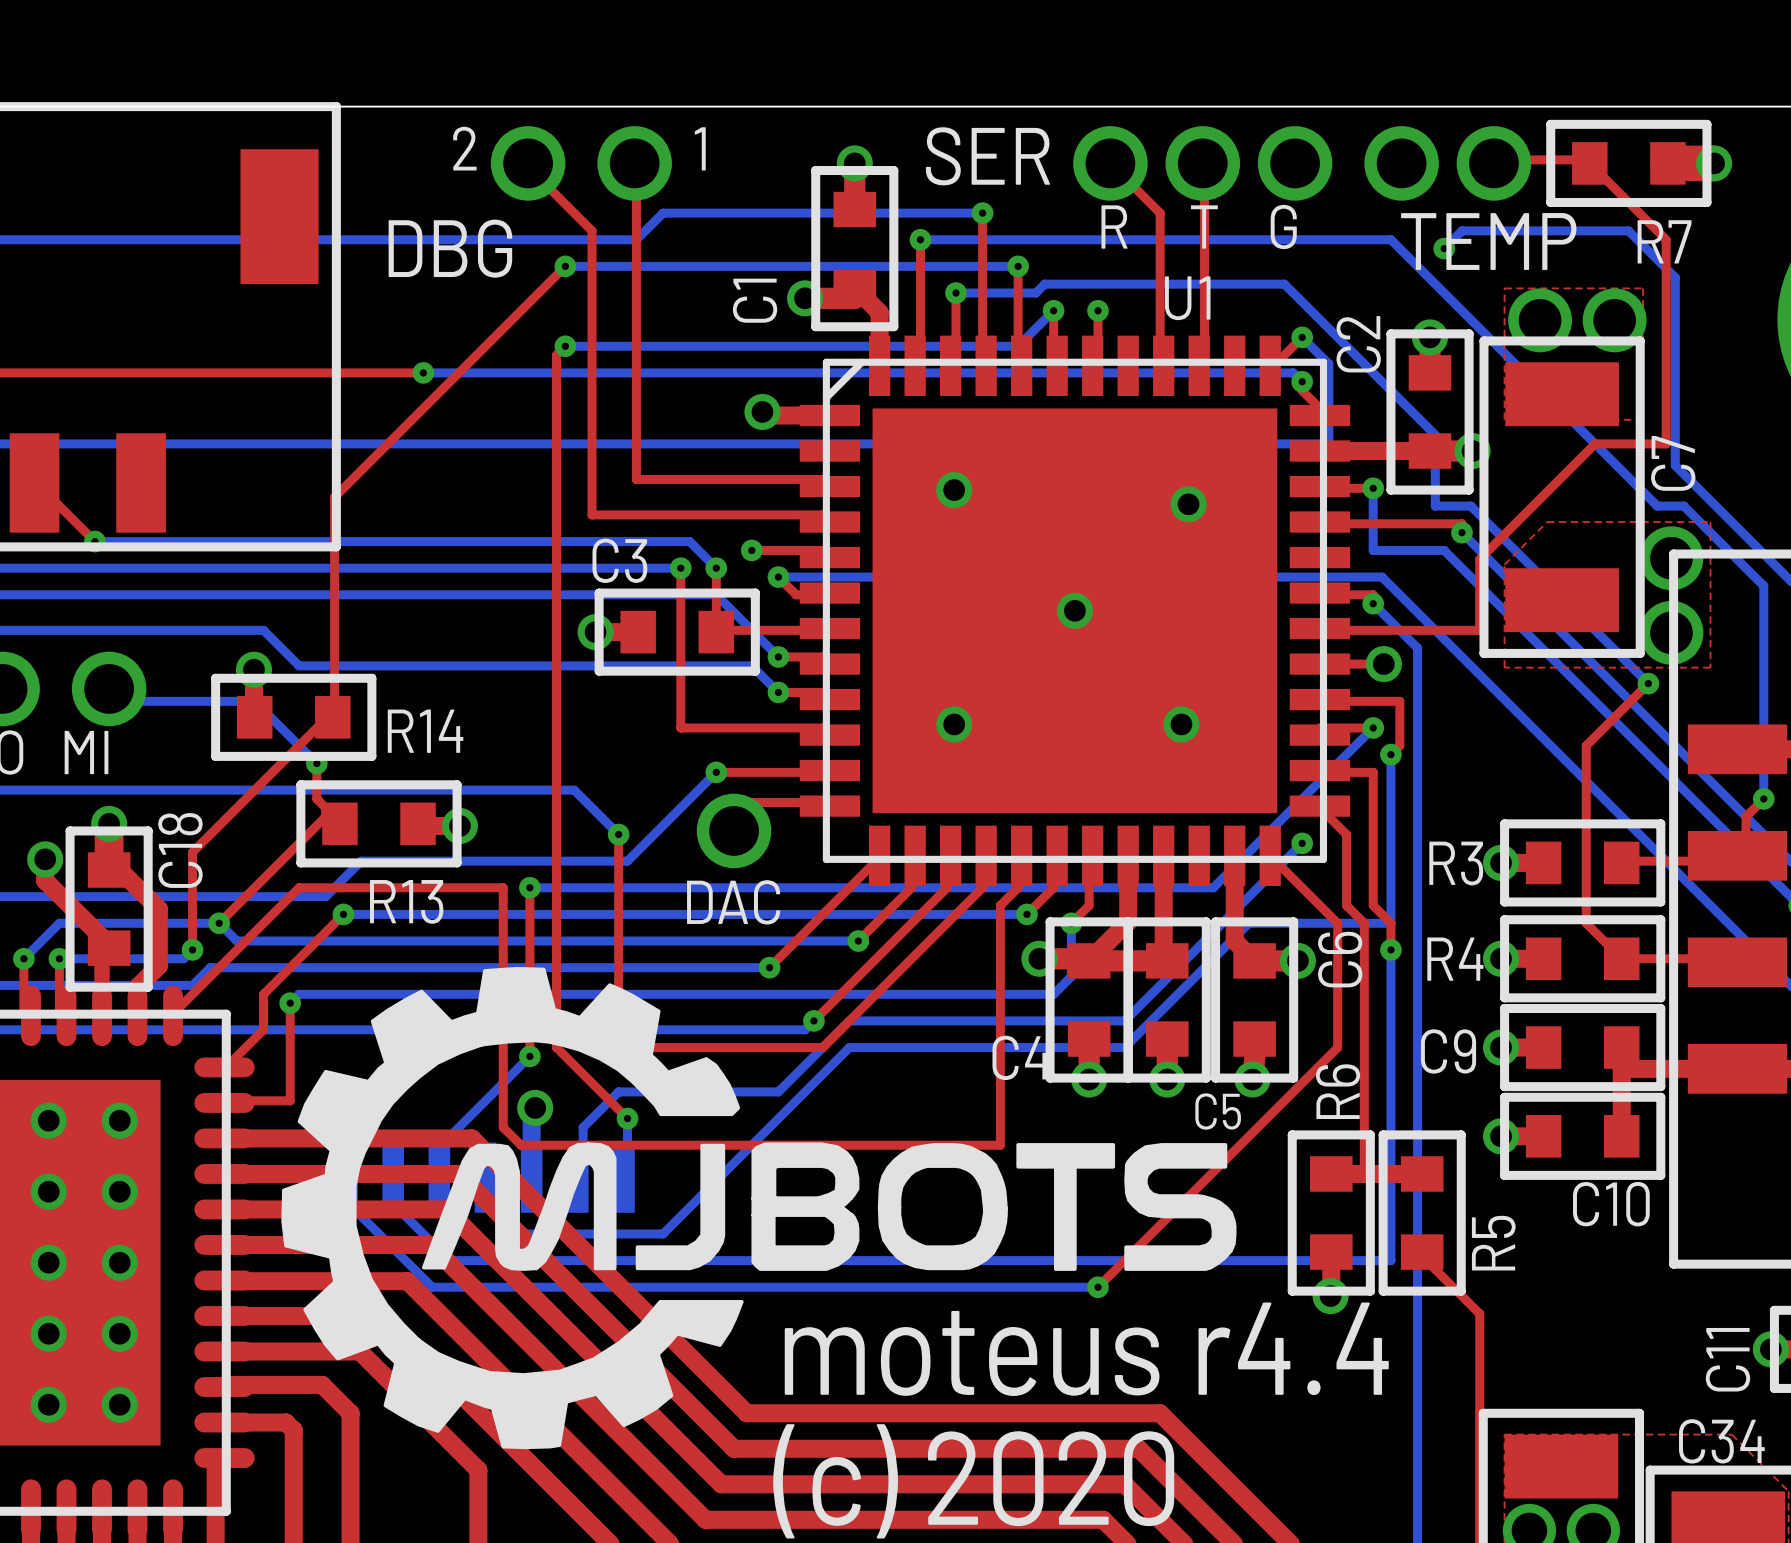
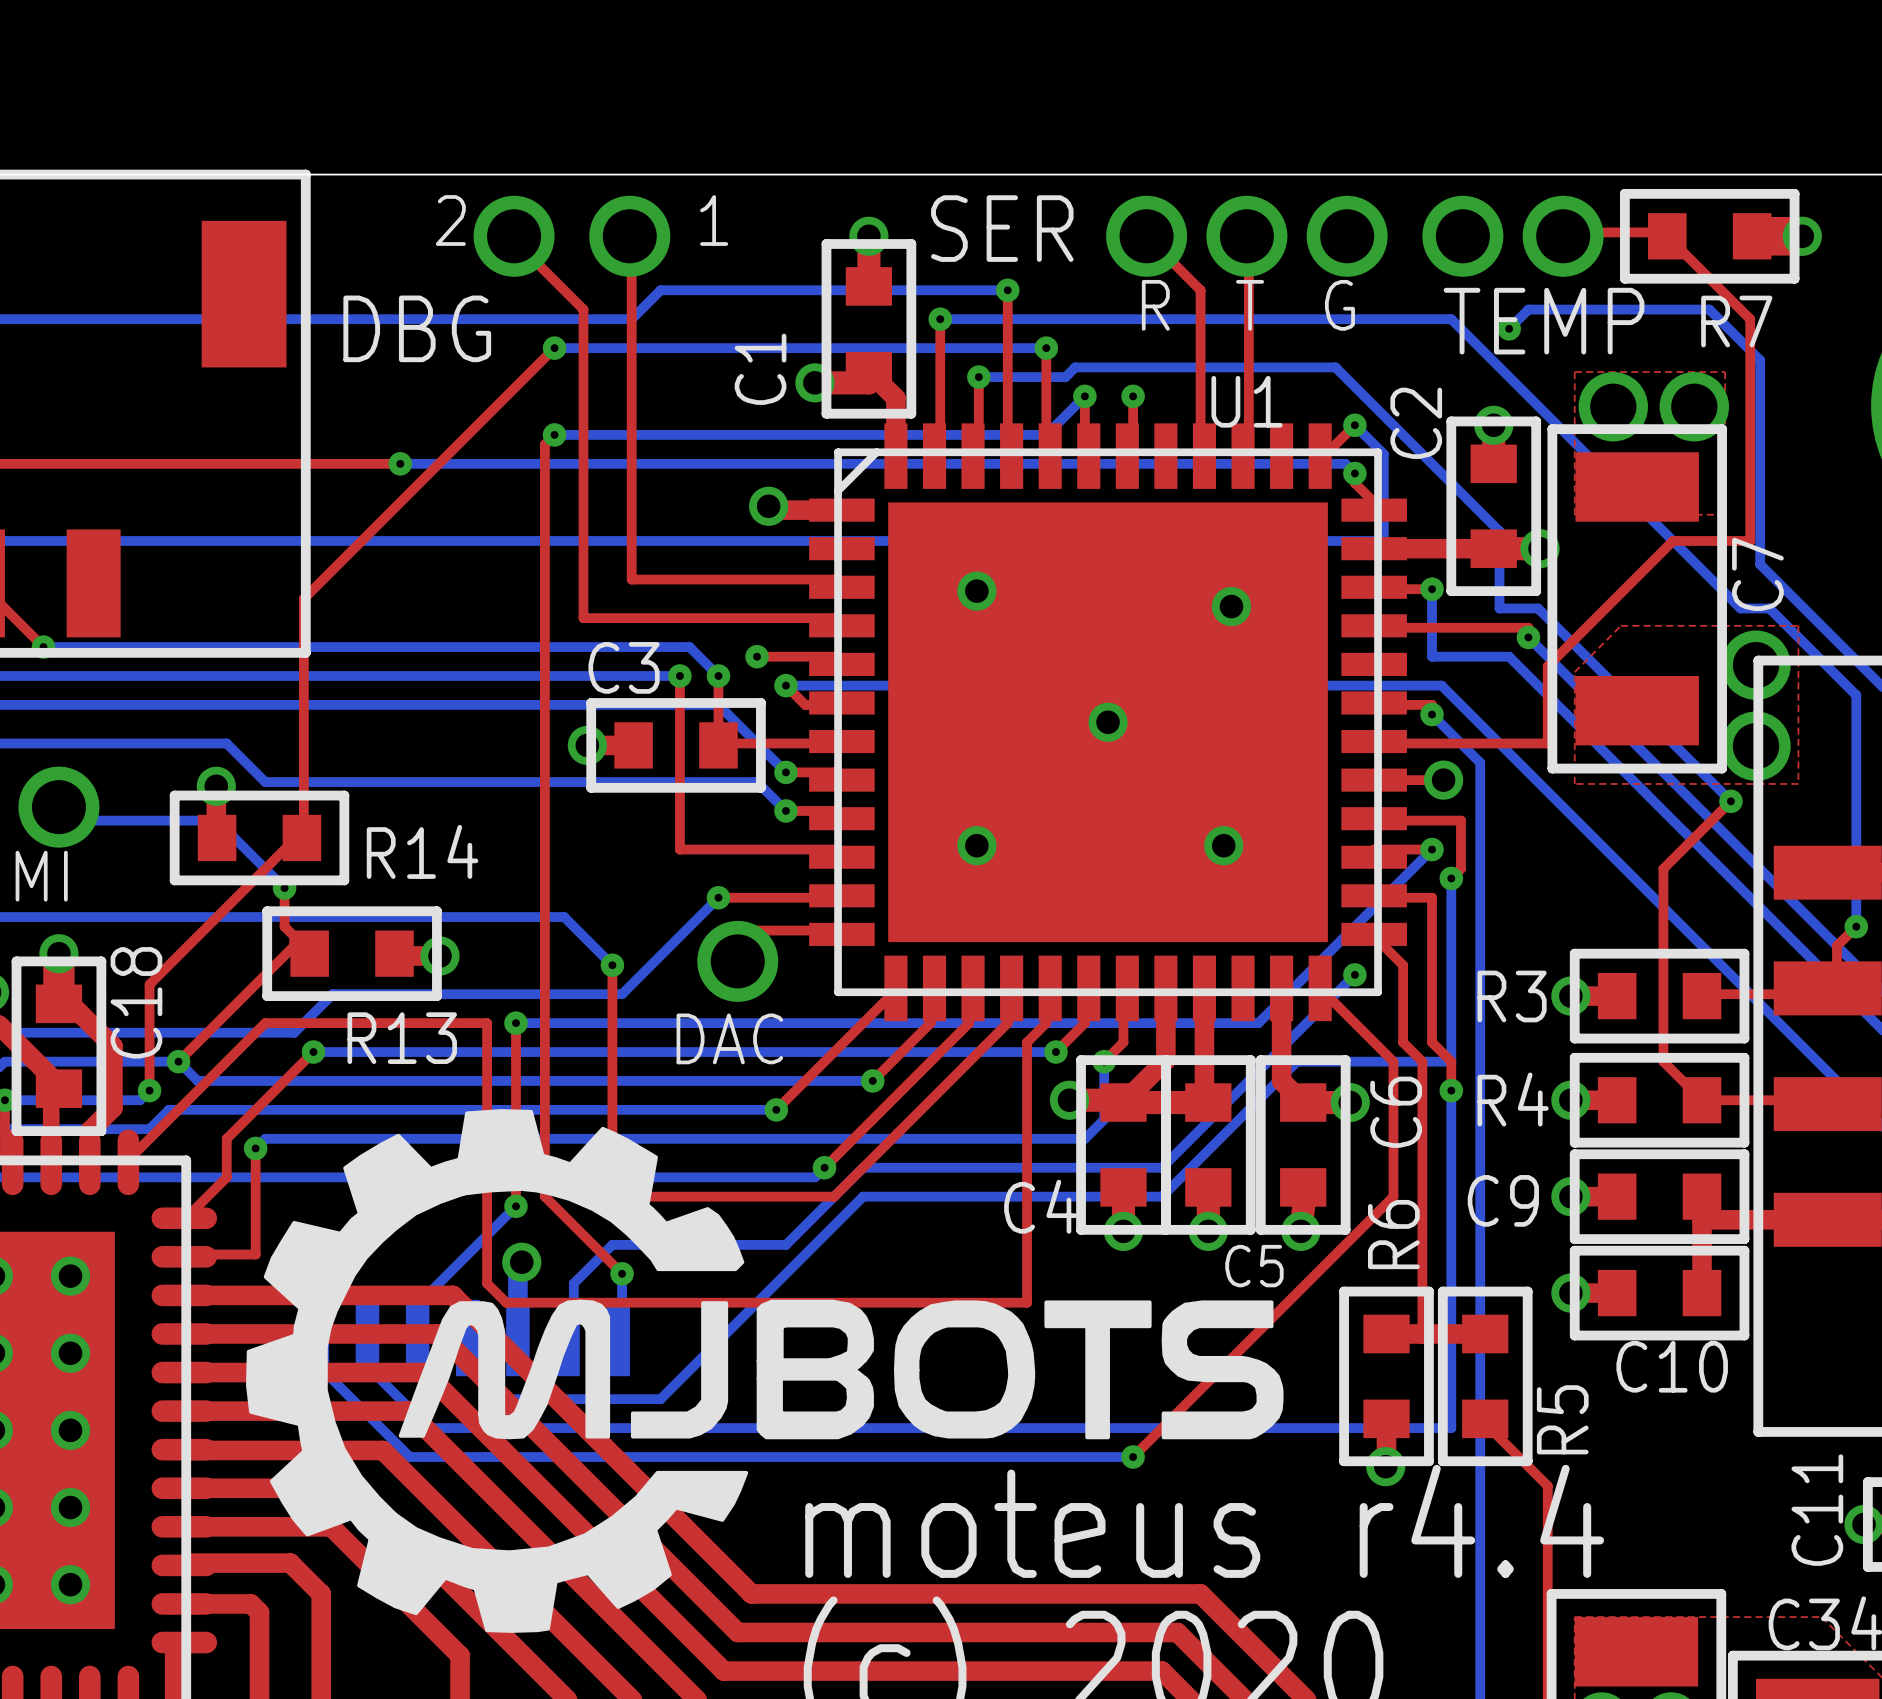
U1 name position: U1 (1187, 298) -> U1 (1247, 401)

